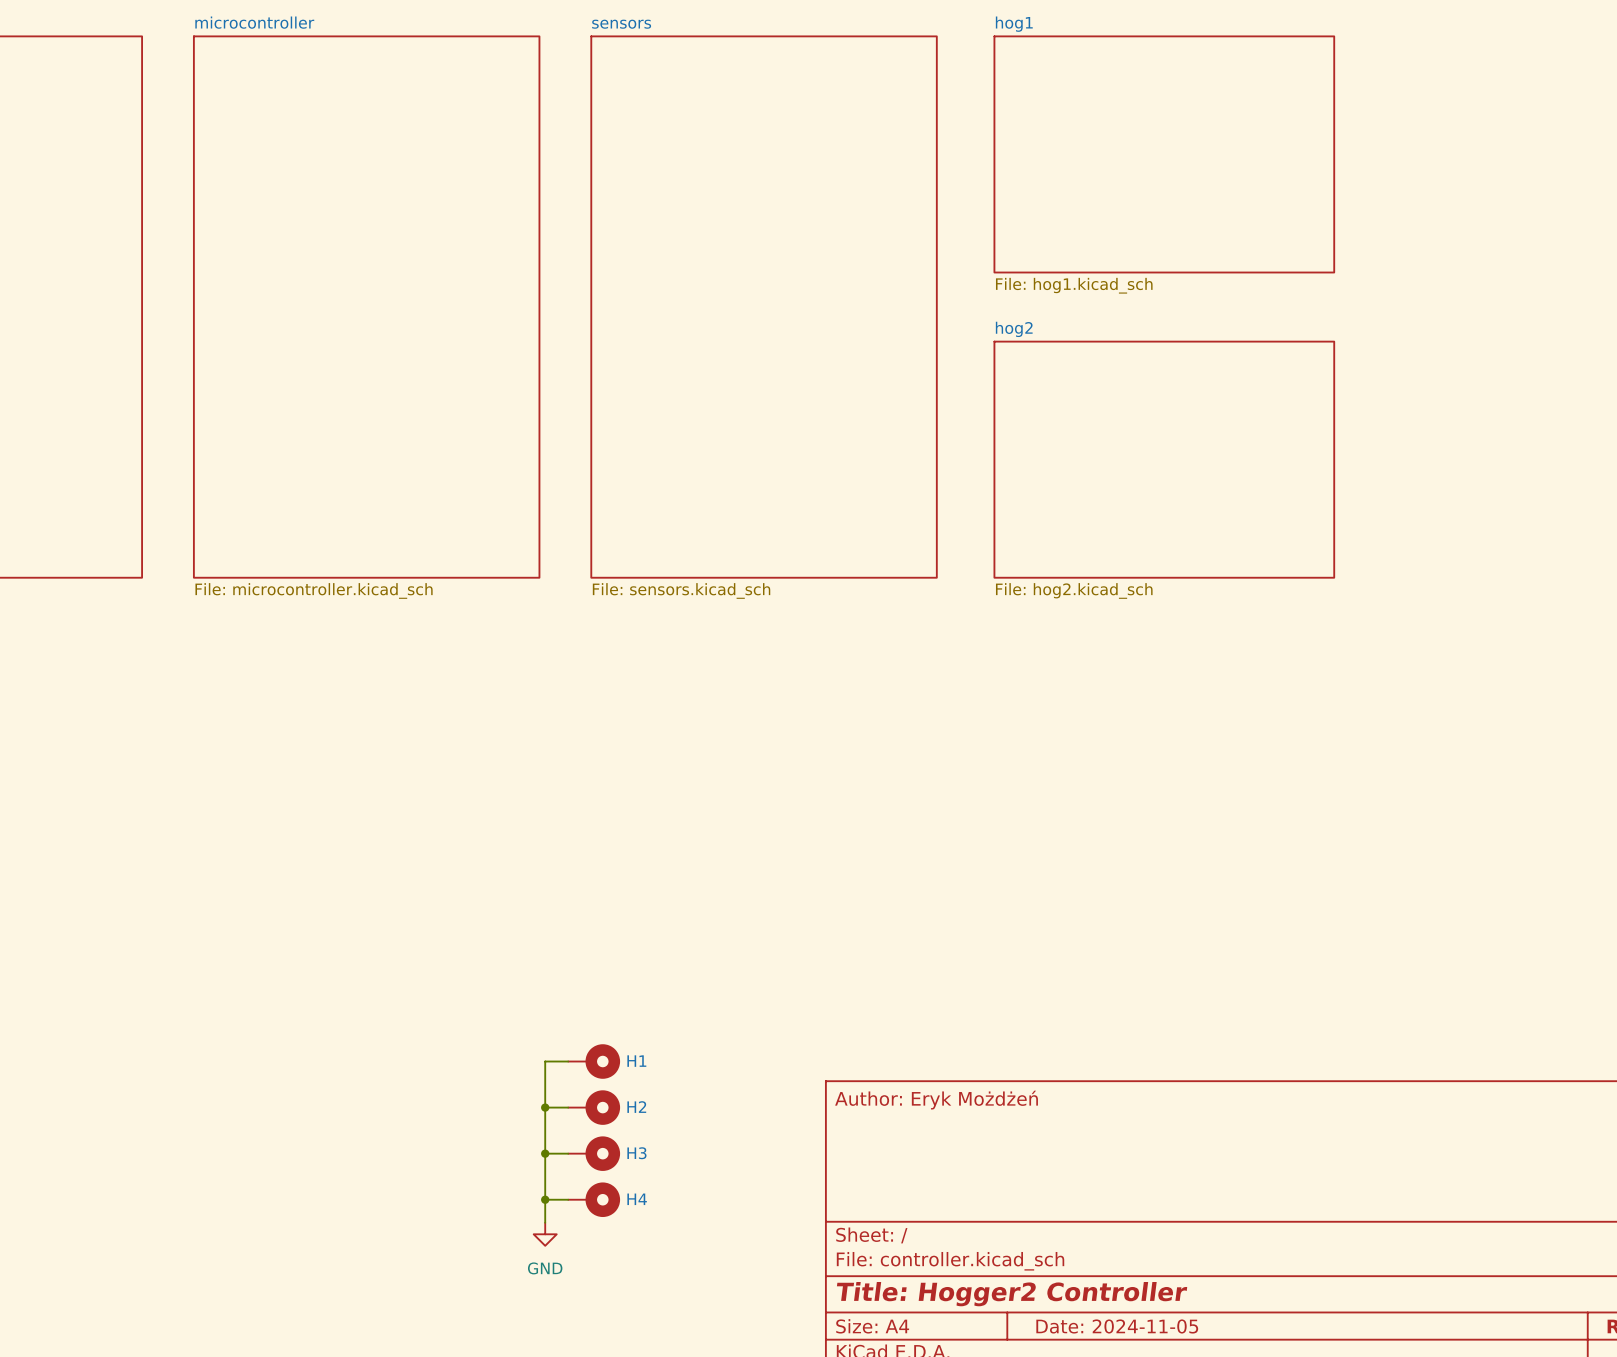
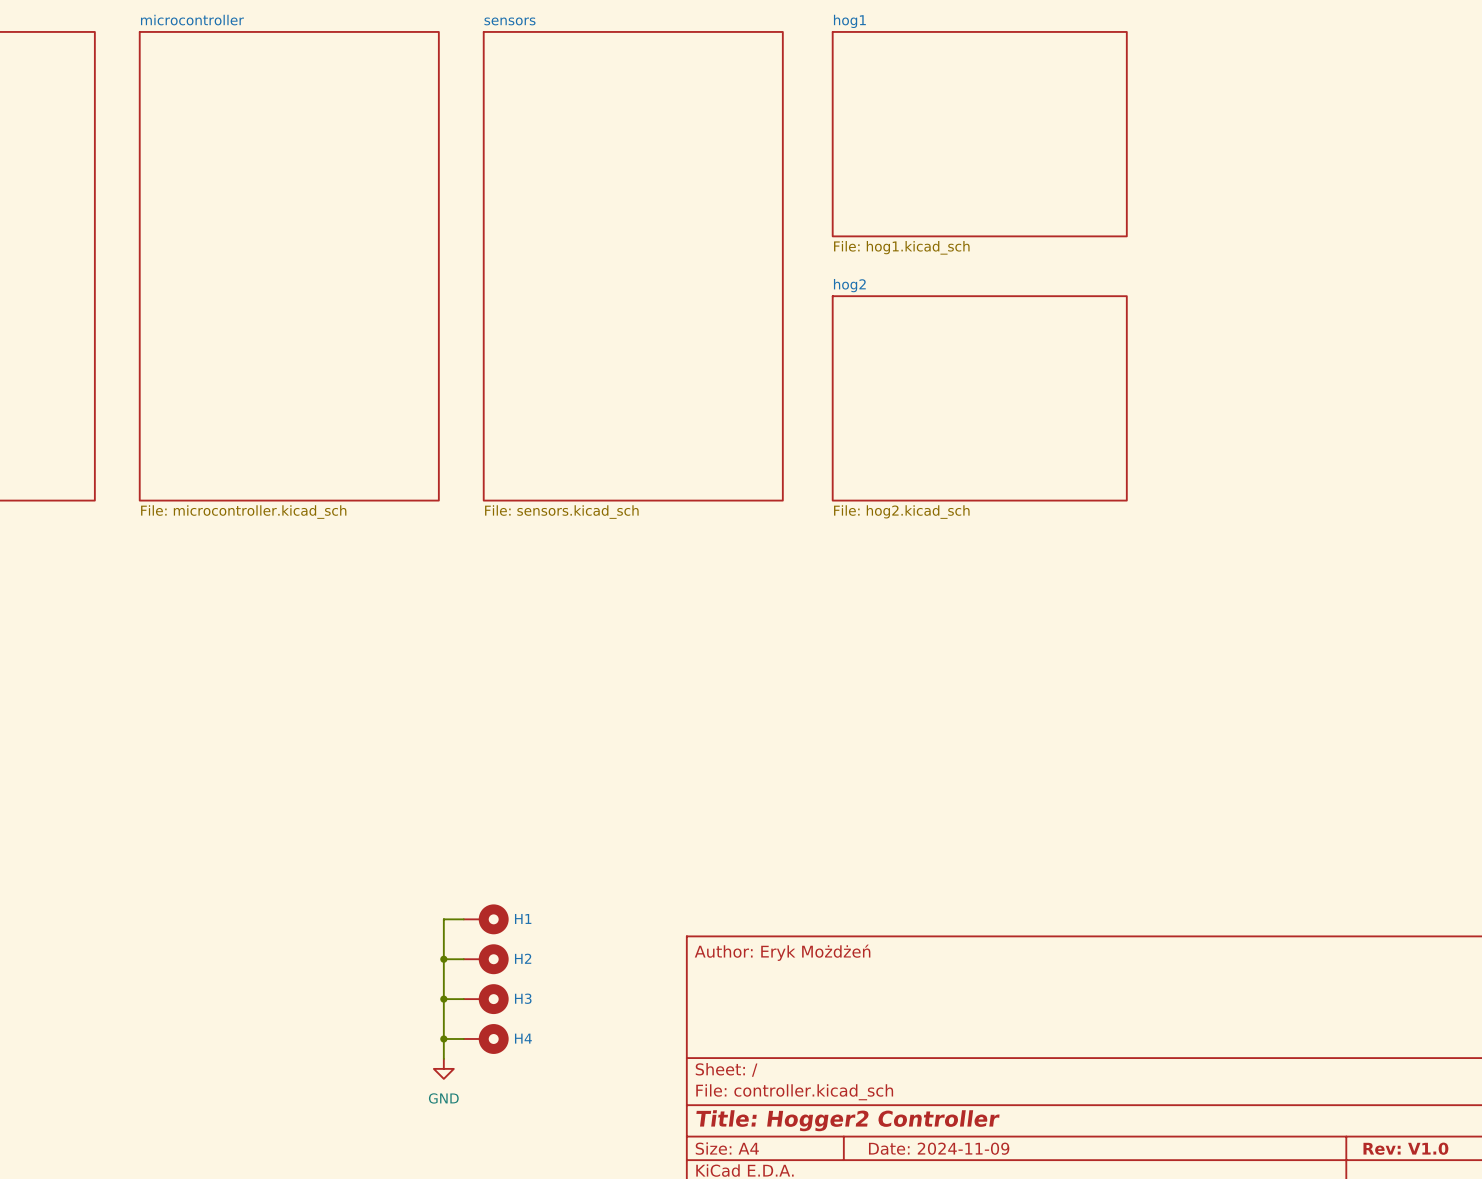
title block: Date: 2024-11-05 (1117, 1326) -> Date: 2024-11-09 (939, 1148)

